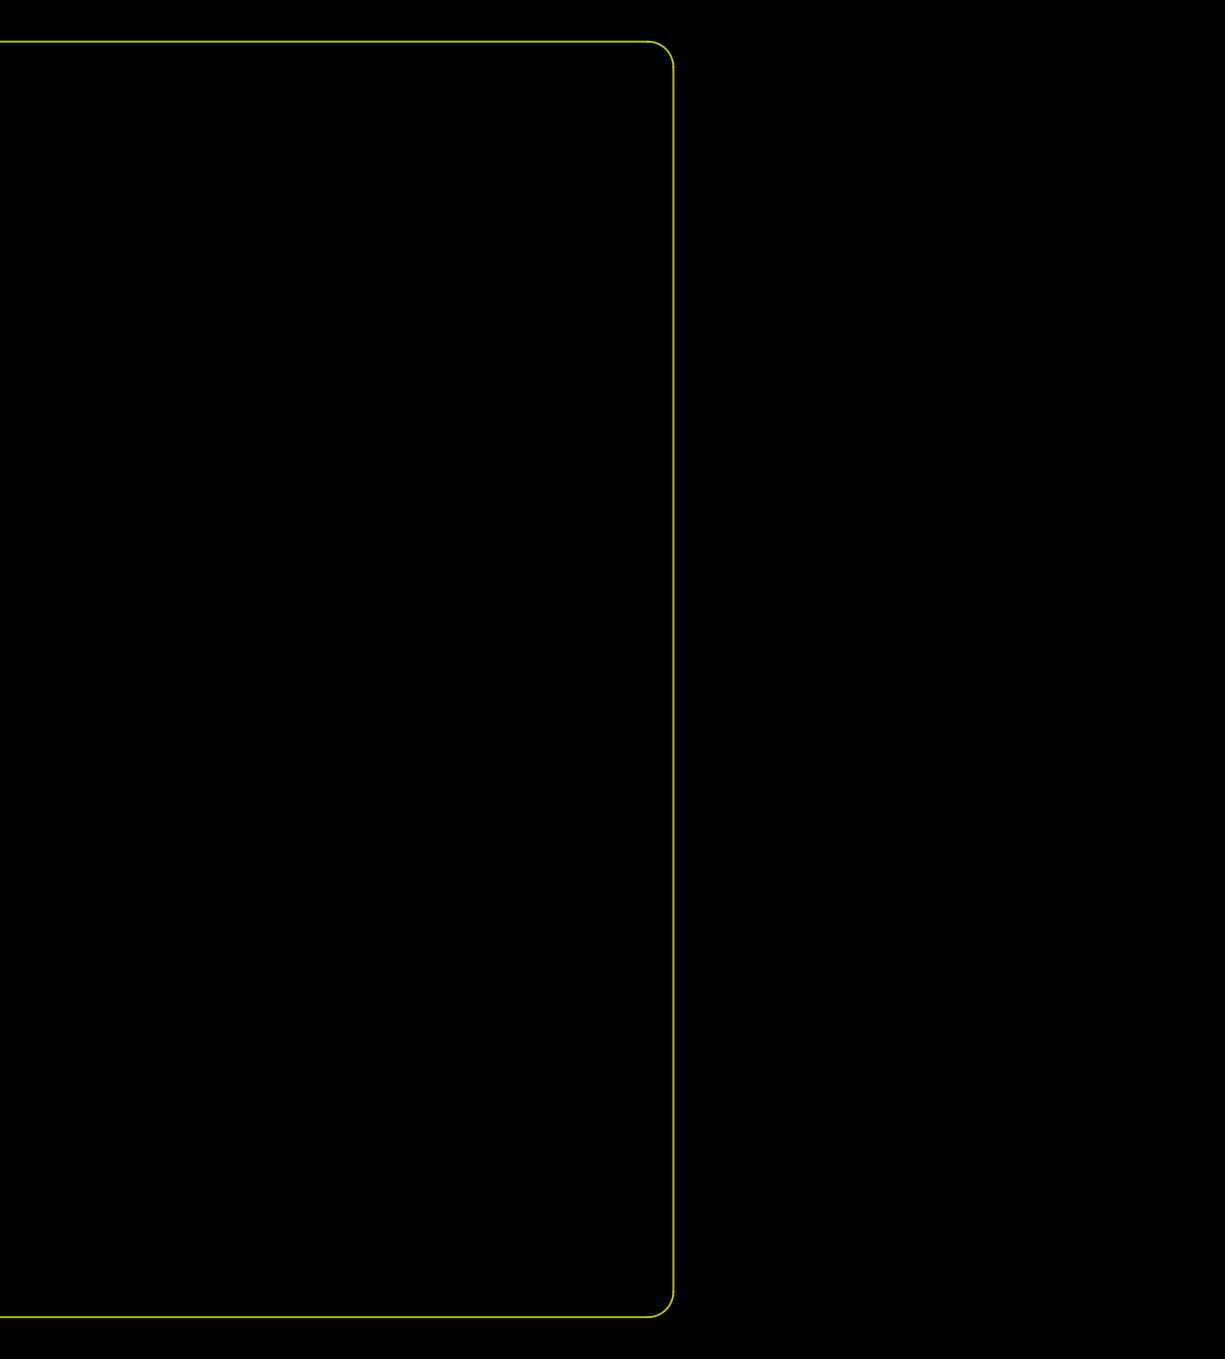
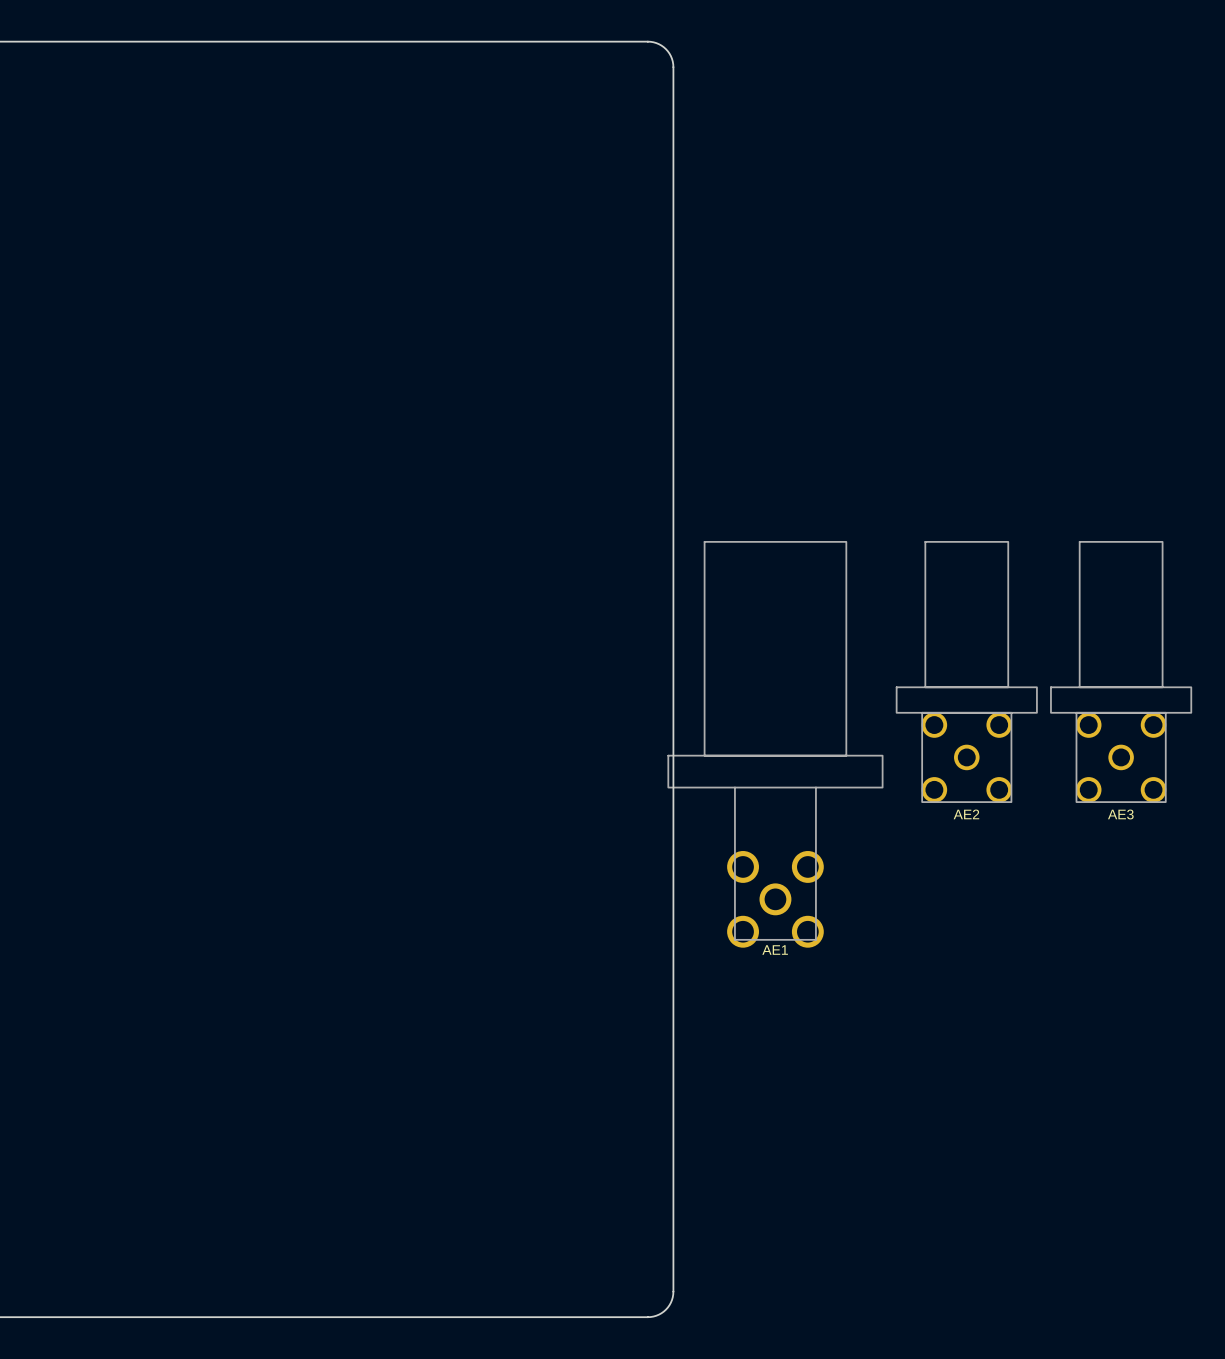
AE2: none -> (966, 671)
AE3: none -> (1121, 671)
AE1: none -> (775, 744)

